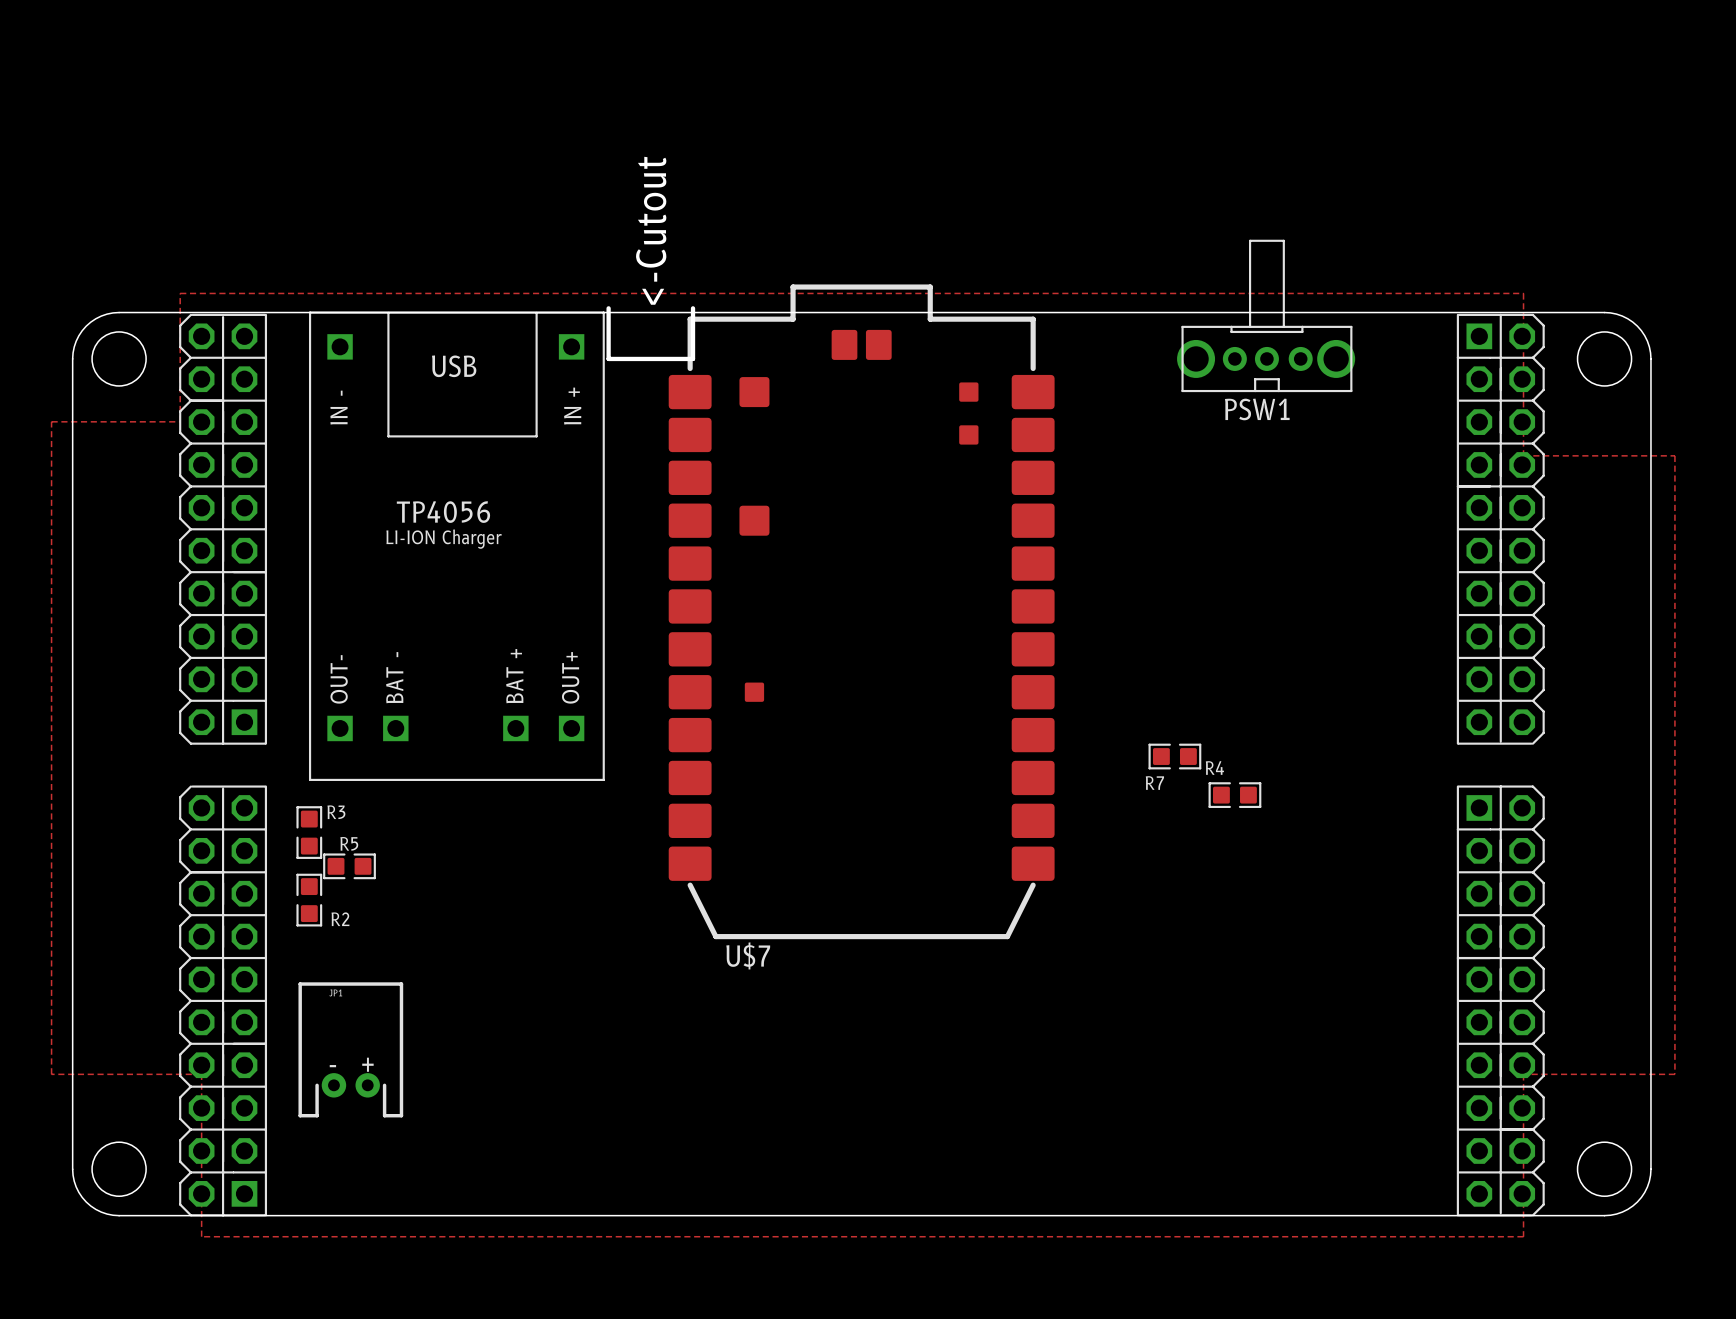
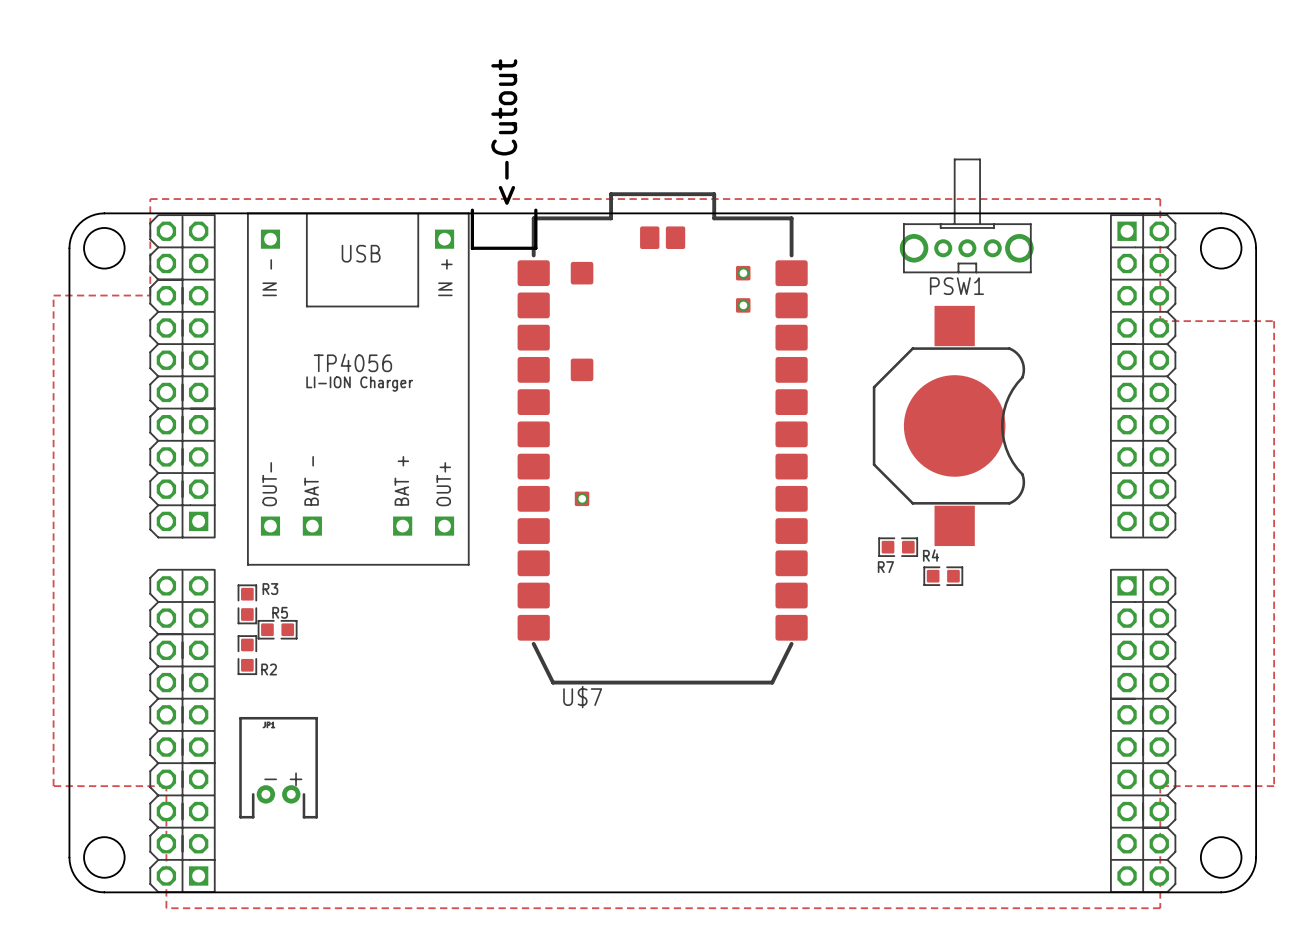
via: none -> (743, 273)
via: none -> (743, 305)
part: none -> (948, 425)
via: none -> (582, 498)

